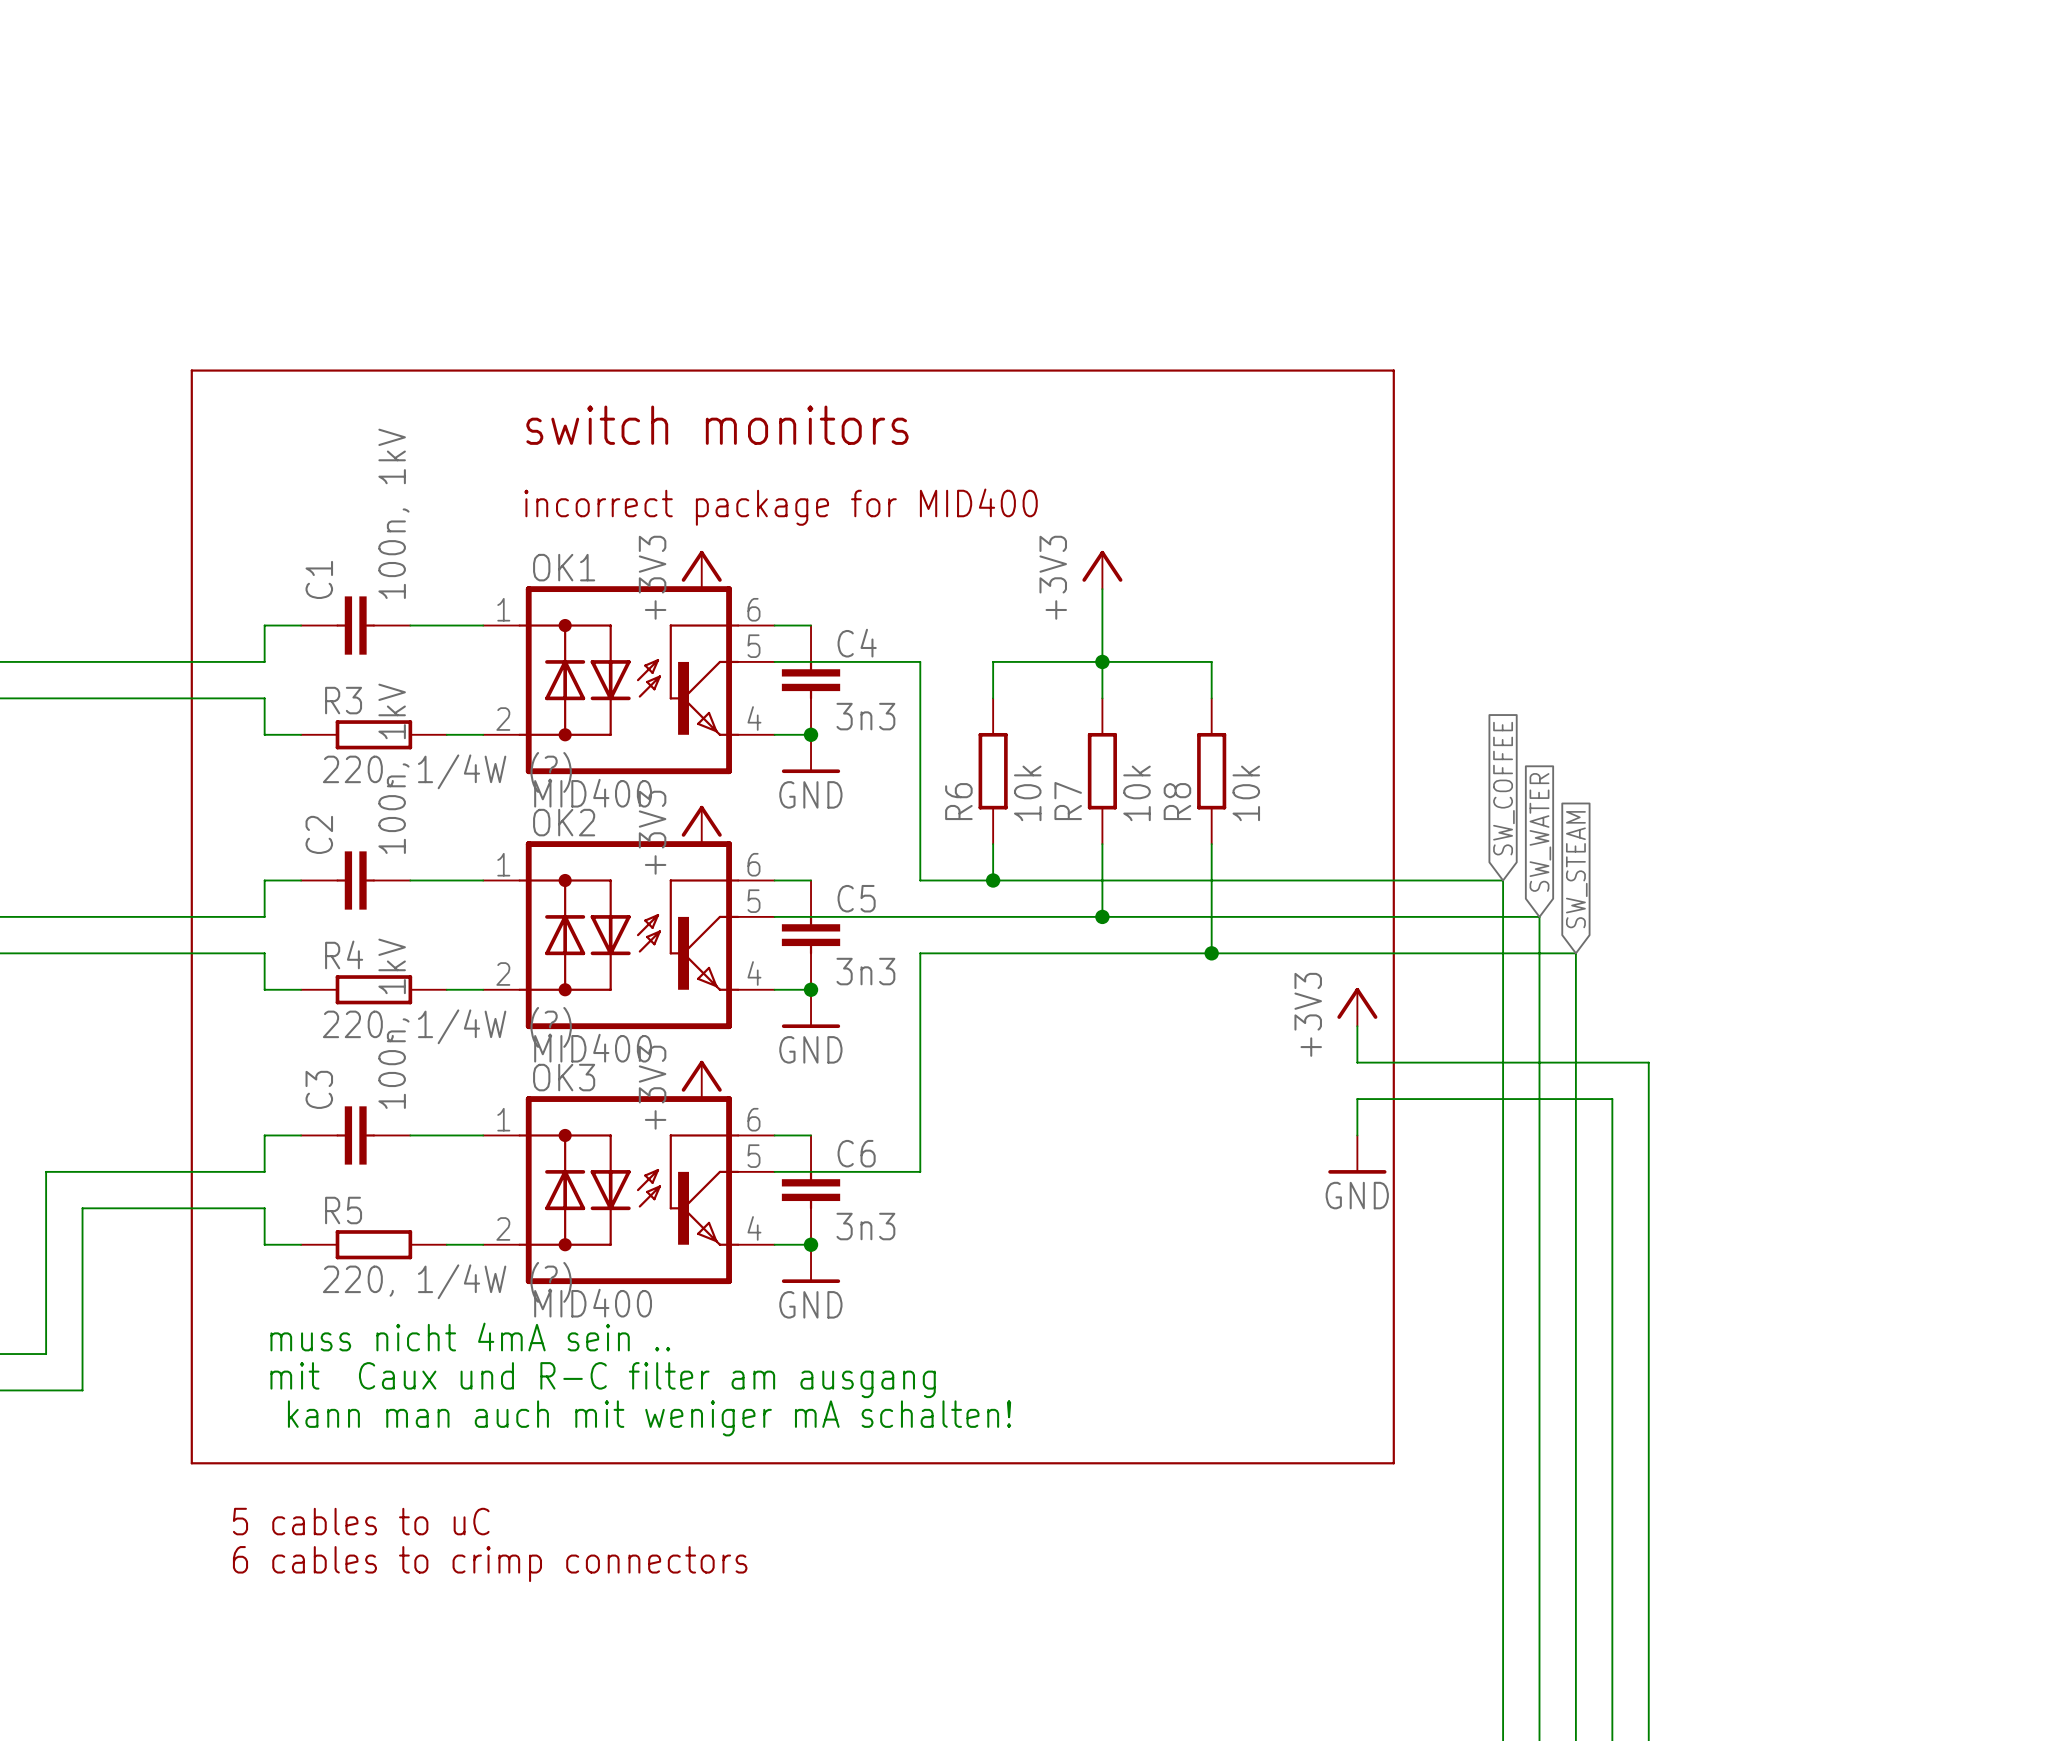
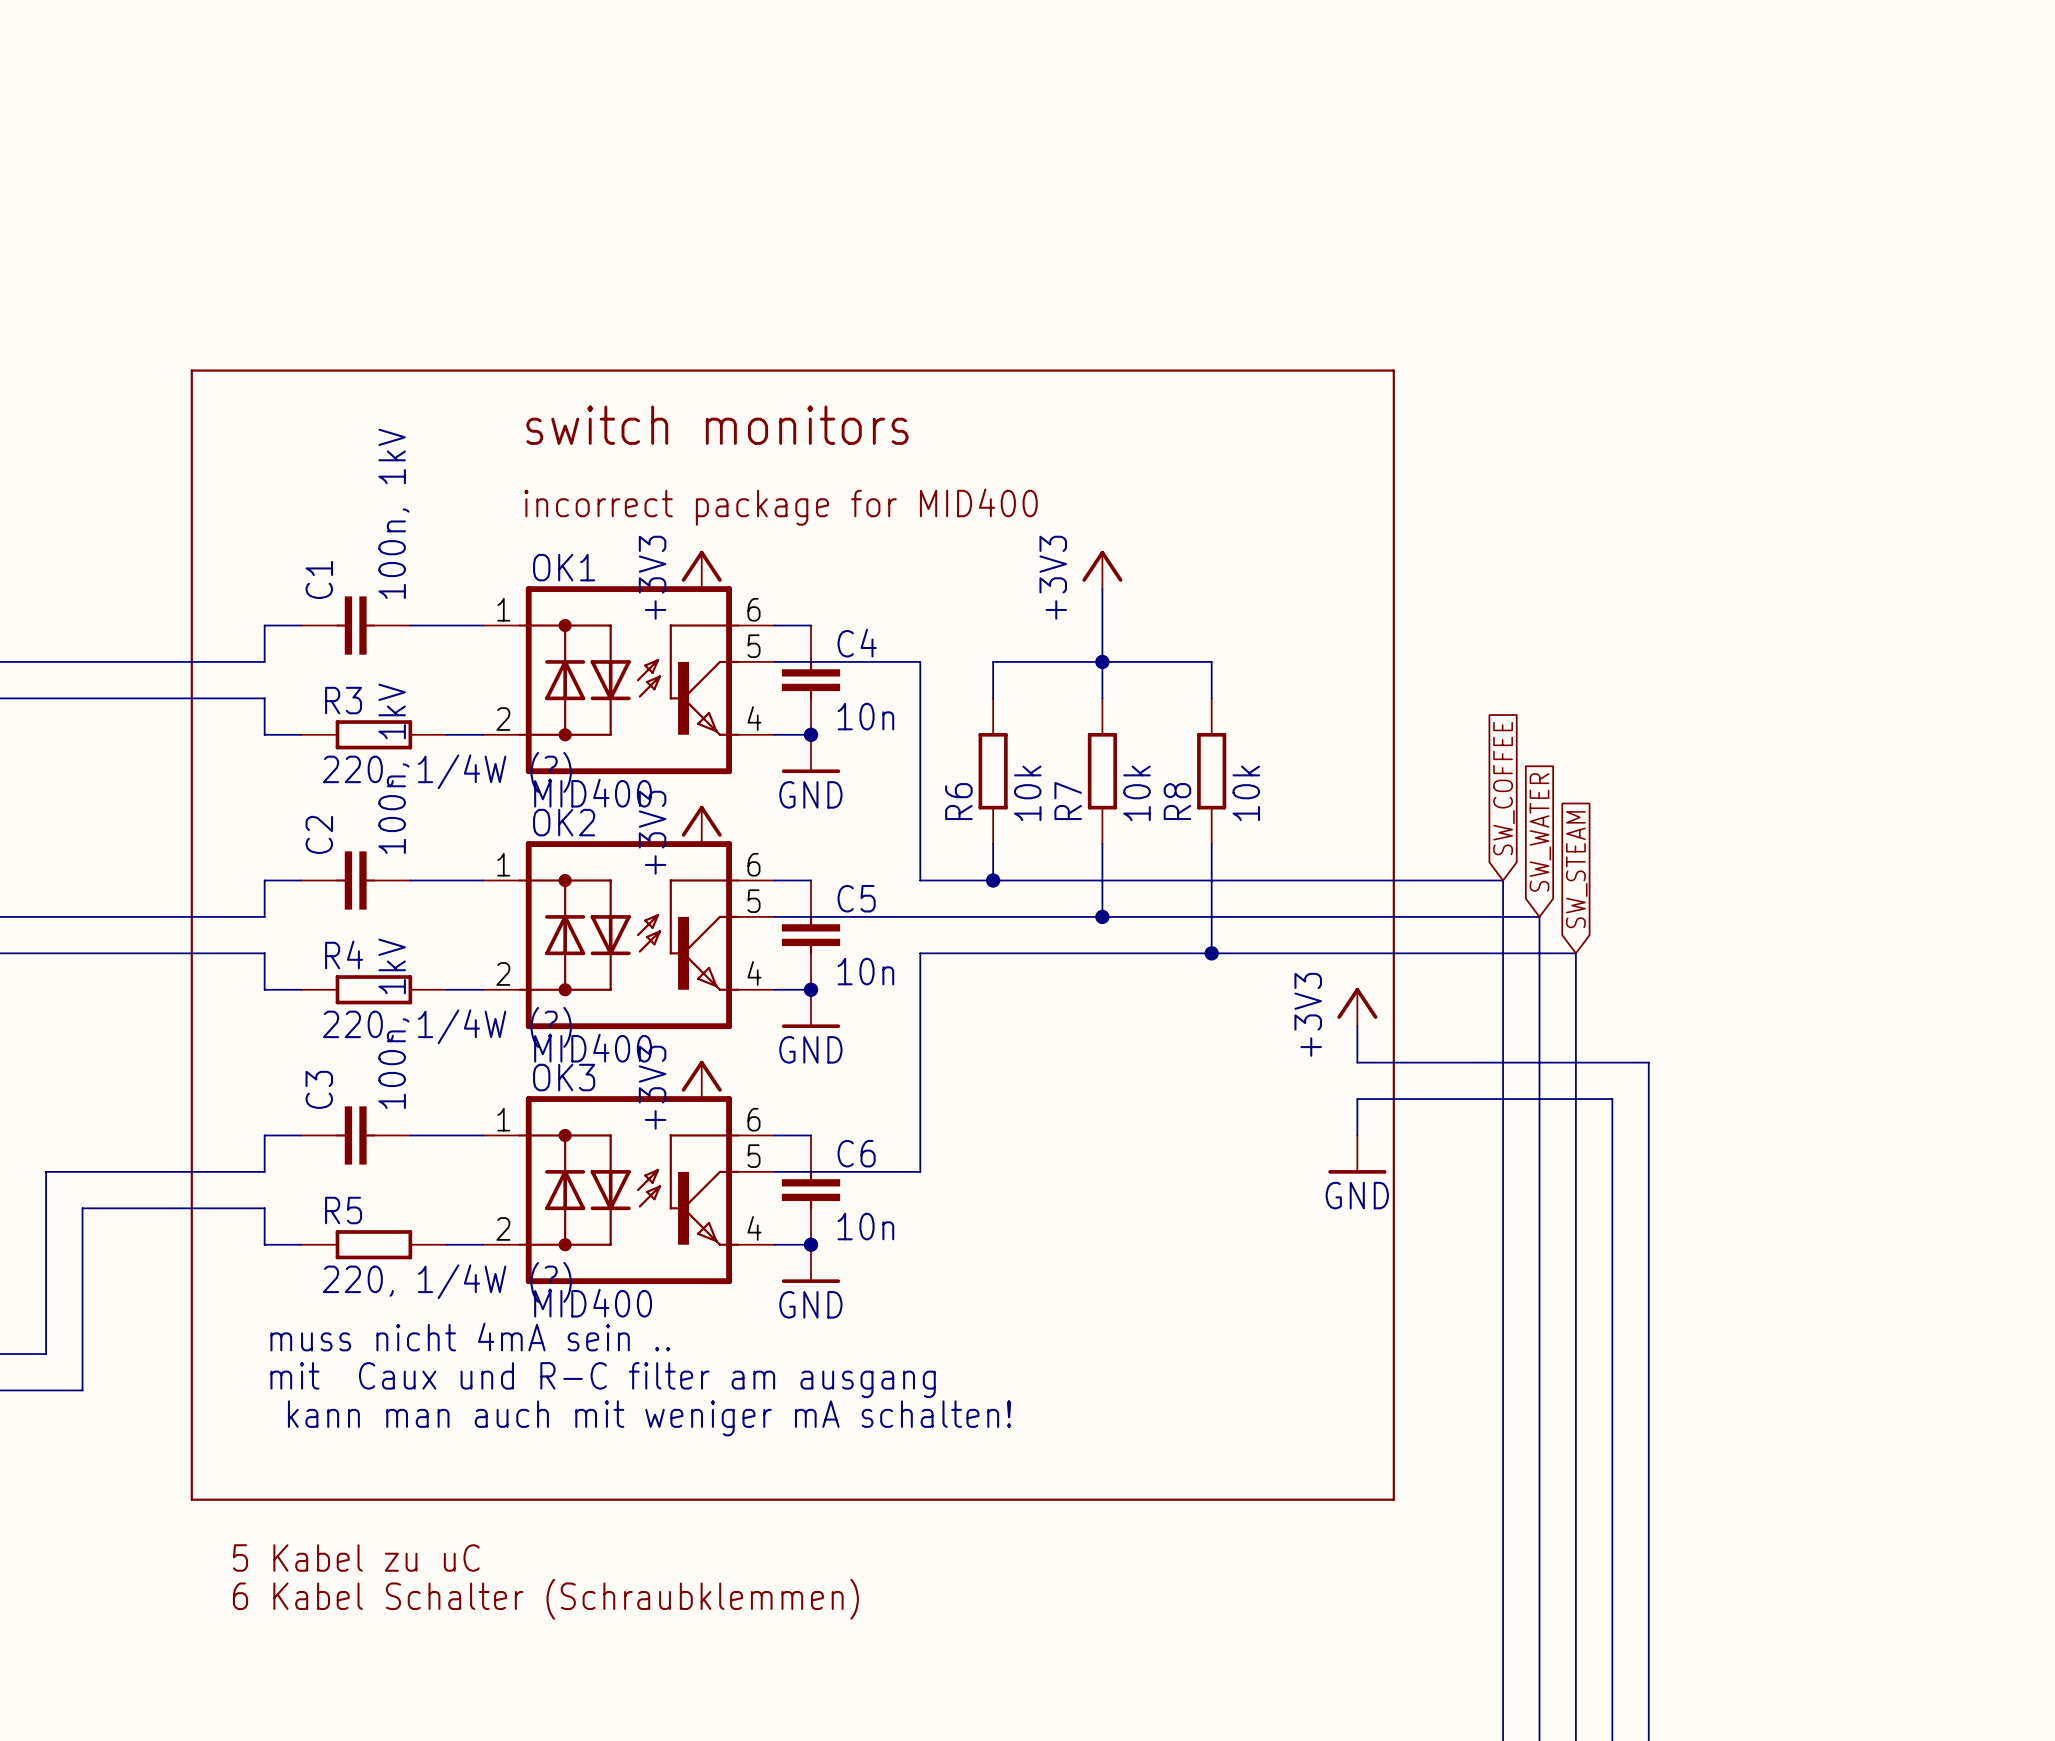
C4 value: 3n3 (865, 716) -> 10n (865, 716)
C5 value: 3n3 (865, 971) -> 10n (865, 971)
C6 value: 3n3 (865, 1226) -> 10n (865, 1226)
line: (191, 1463) (1393, 1463) -> (191, 1463) (191, 1499) (1393, 1499) (1393, 1463)
text: 5 cables to uC (361, 1521) -> none
text: 6 cables to crimp connectors (490, 1564) -> 5 Kabel zu uC (356, 1557)
text: none -> 6 Kabel Schalter (Schraubklemmen) (545, 1599)

